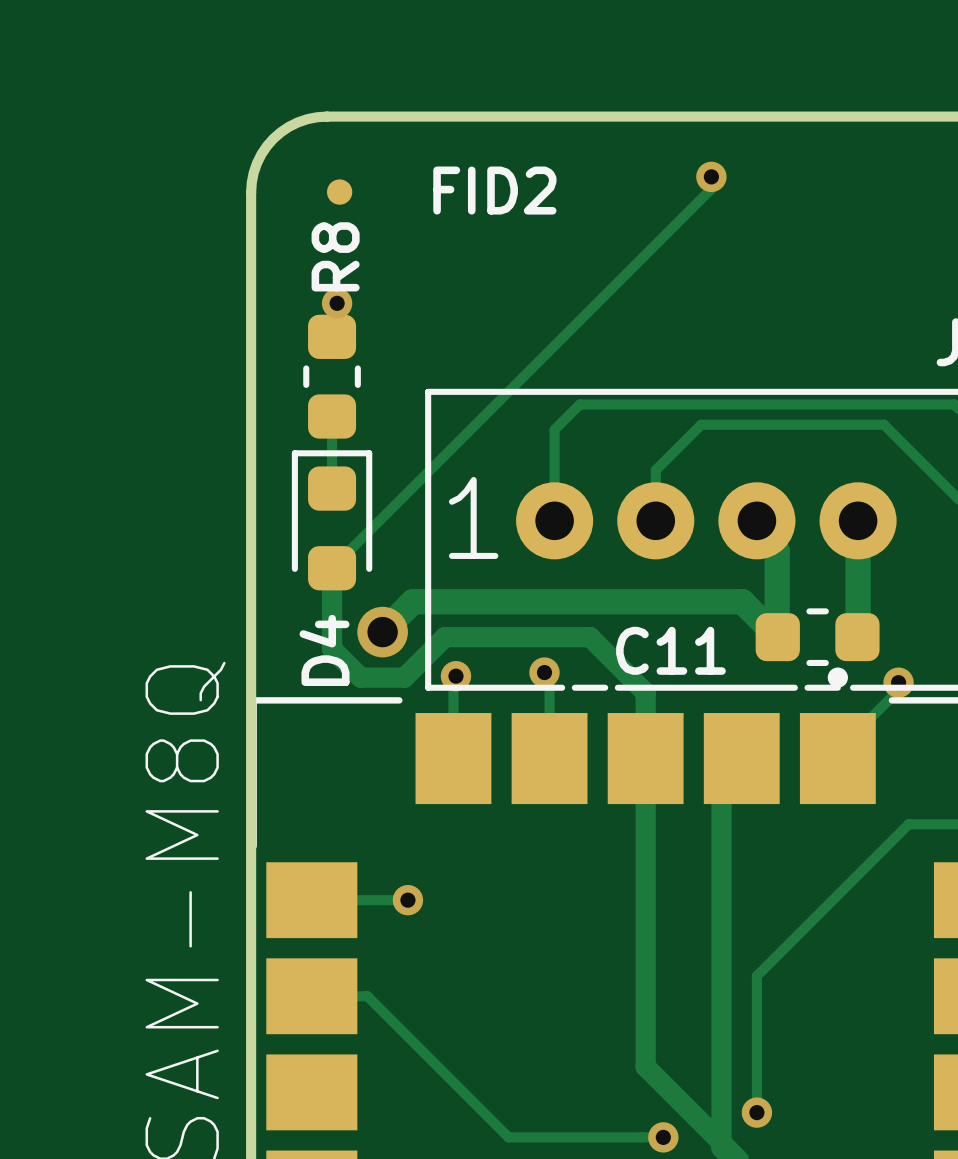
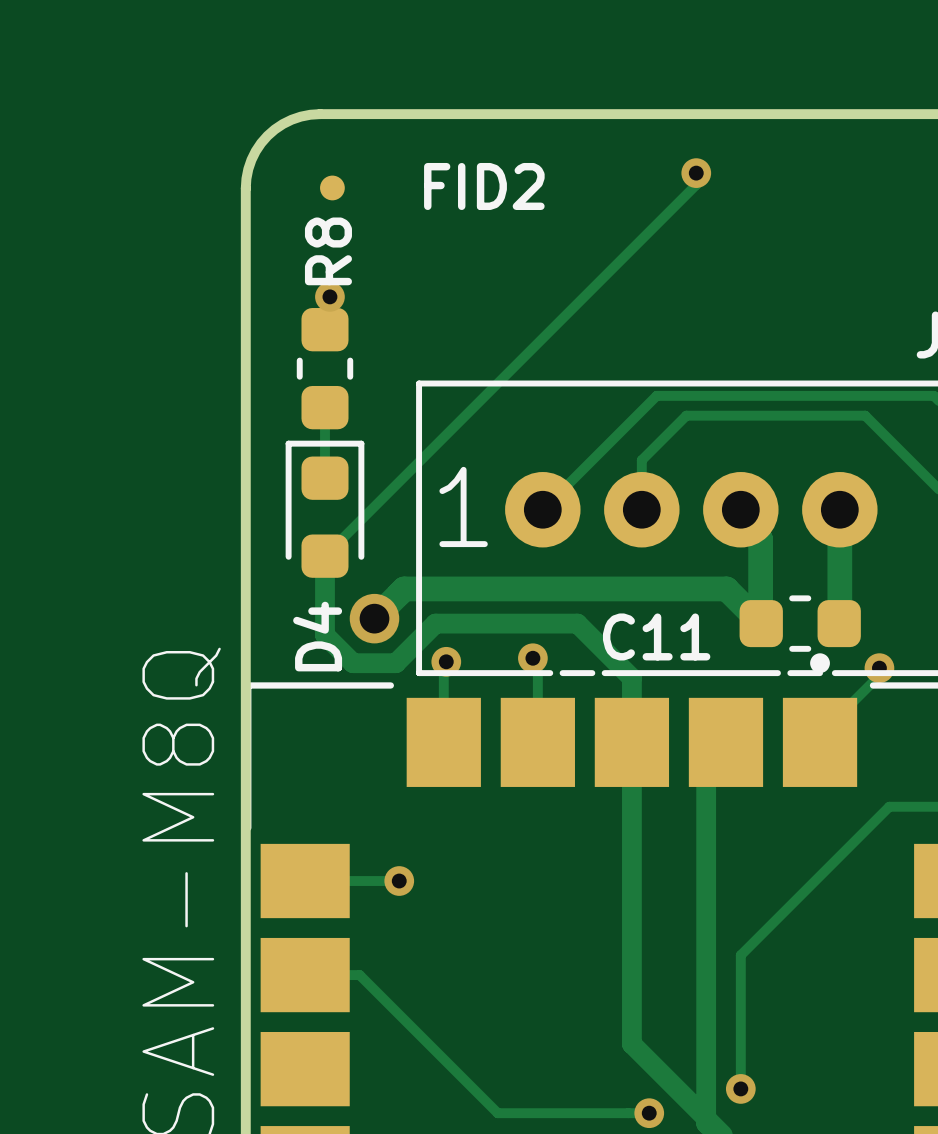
track: (670, 404) (579, 404) (554, 429) (554, 520) -> (656, 395) (542, 509)

